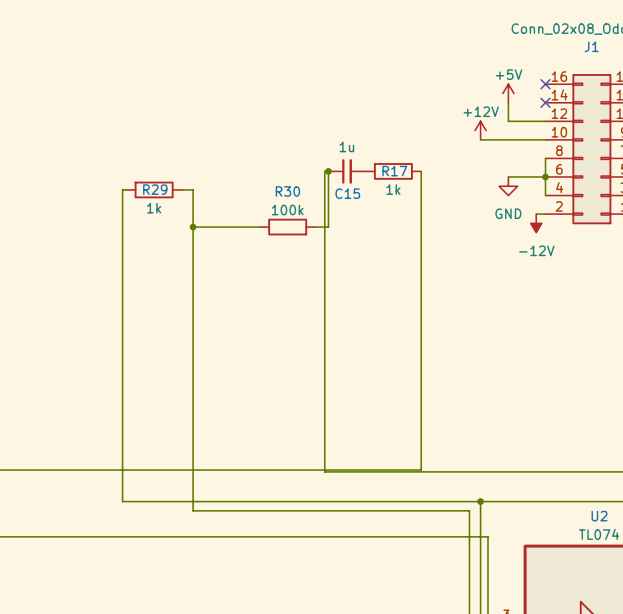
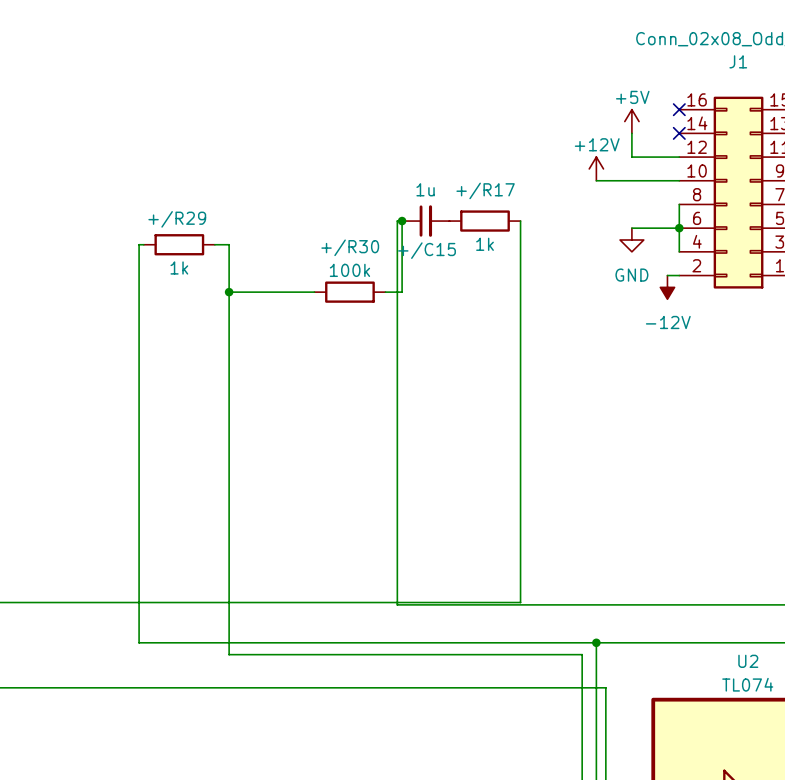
R17 name: R17 (394, 171) -> +/R17 (485, 190)
R29 name: R29 (155, 189) -> +/R29 (177, 219)
R30 name: R30 (287, 191) -> +/R30 (350, 247)
C15 name: C15 (347, 193) -> +/C15 (427, 250)

